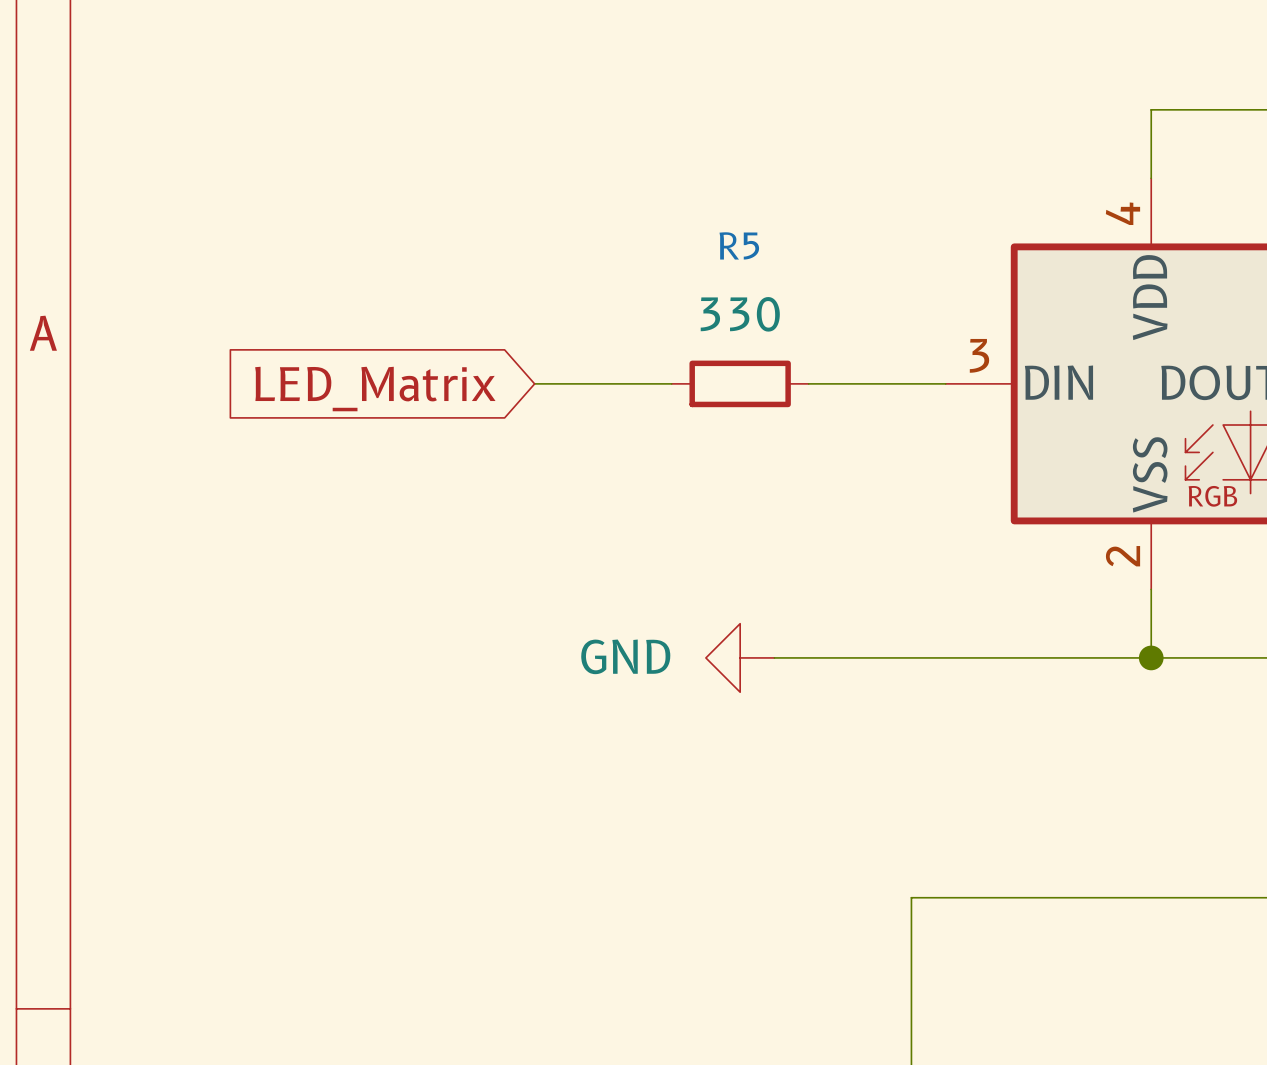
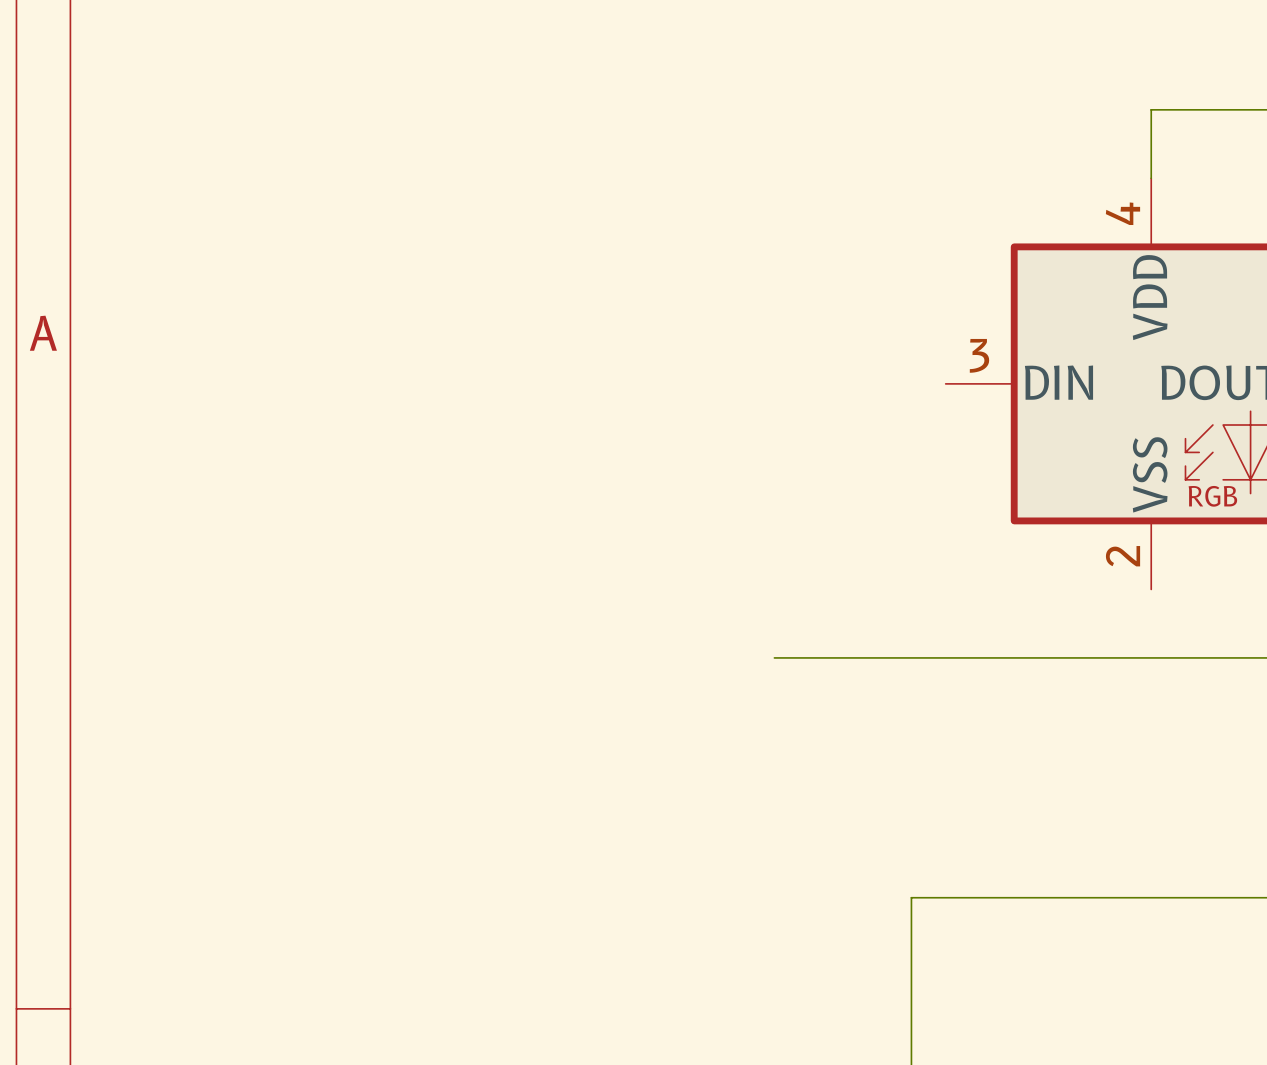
wire: (534, 383) (671, 383) -> none
R5: 330 (740, 383) -> none
wire: (808, 383) (945, 383) -> none
global label: LED_Matrix (375, 389) -> none
wire: (1151, 589) (1151, 657) -> none
power symbol: GND (740, 657) -> none
junction: (1151, 657) -> none

